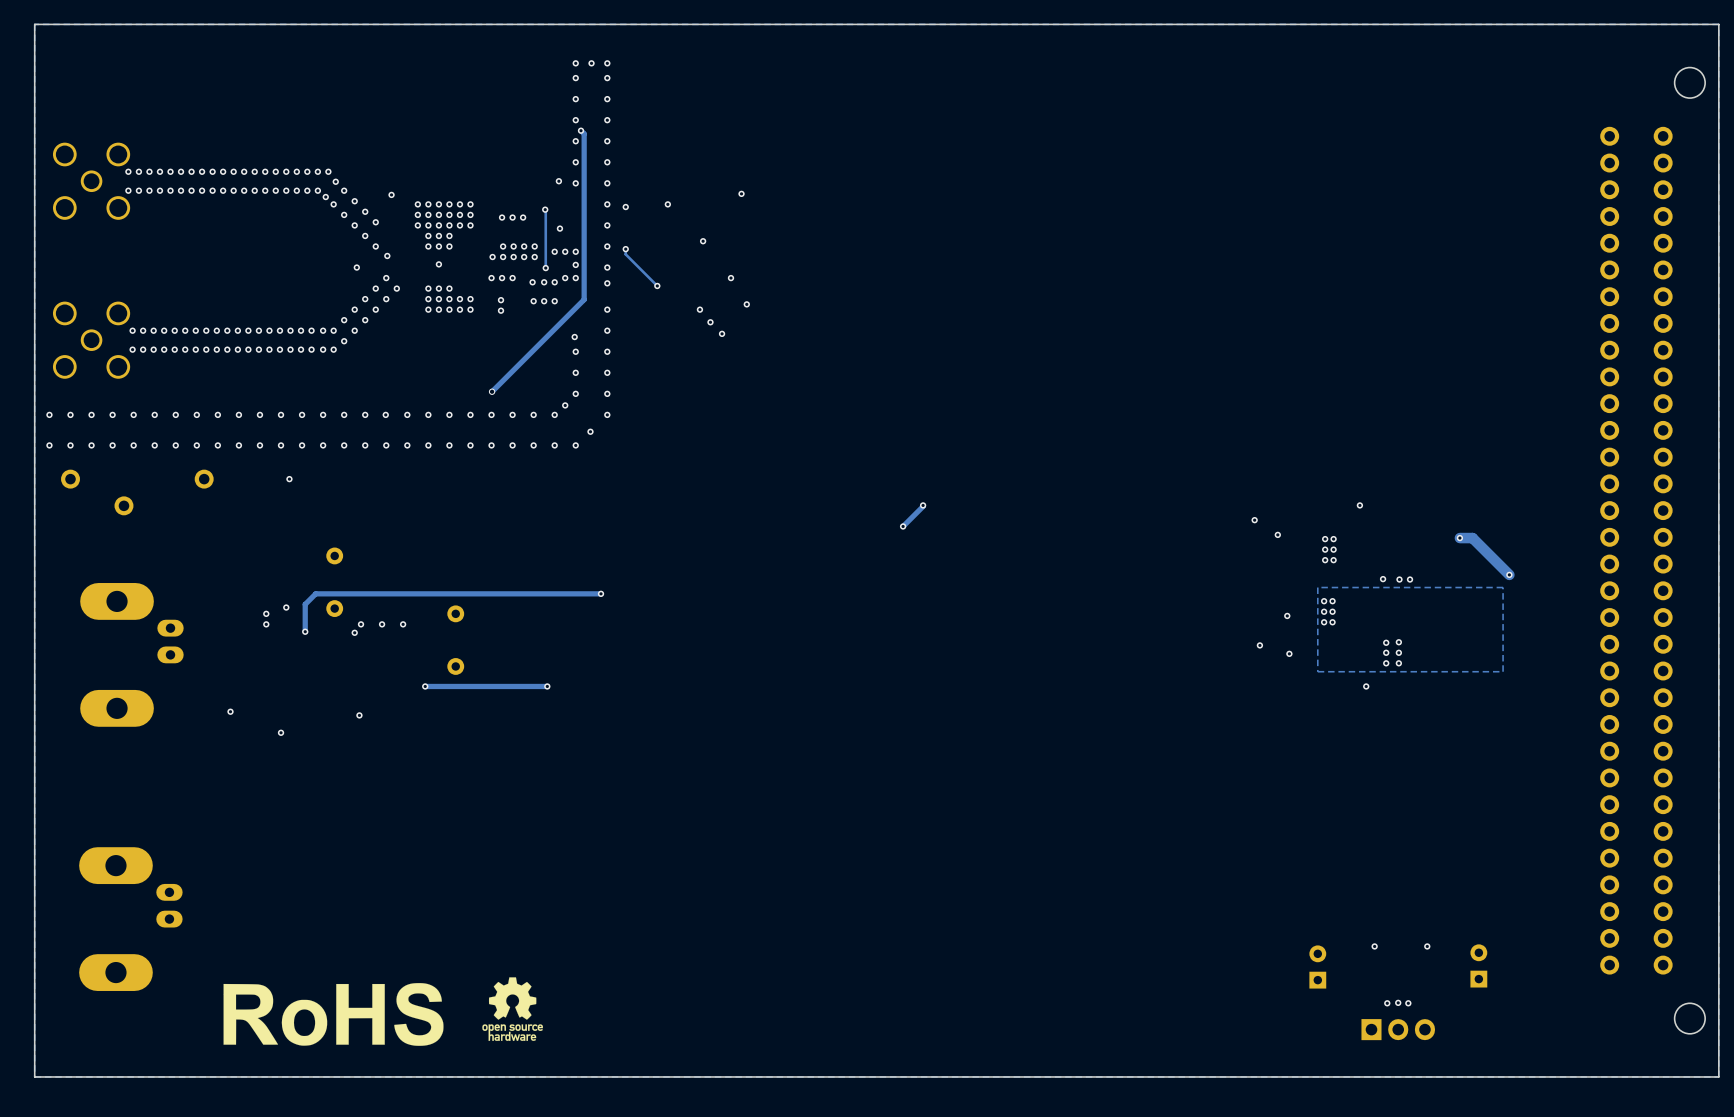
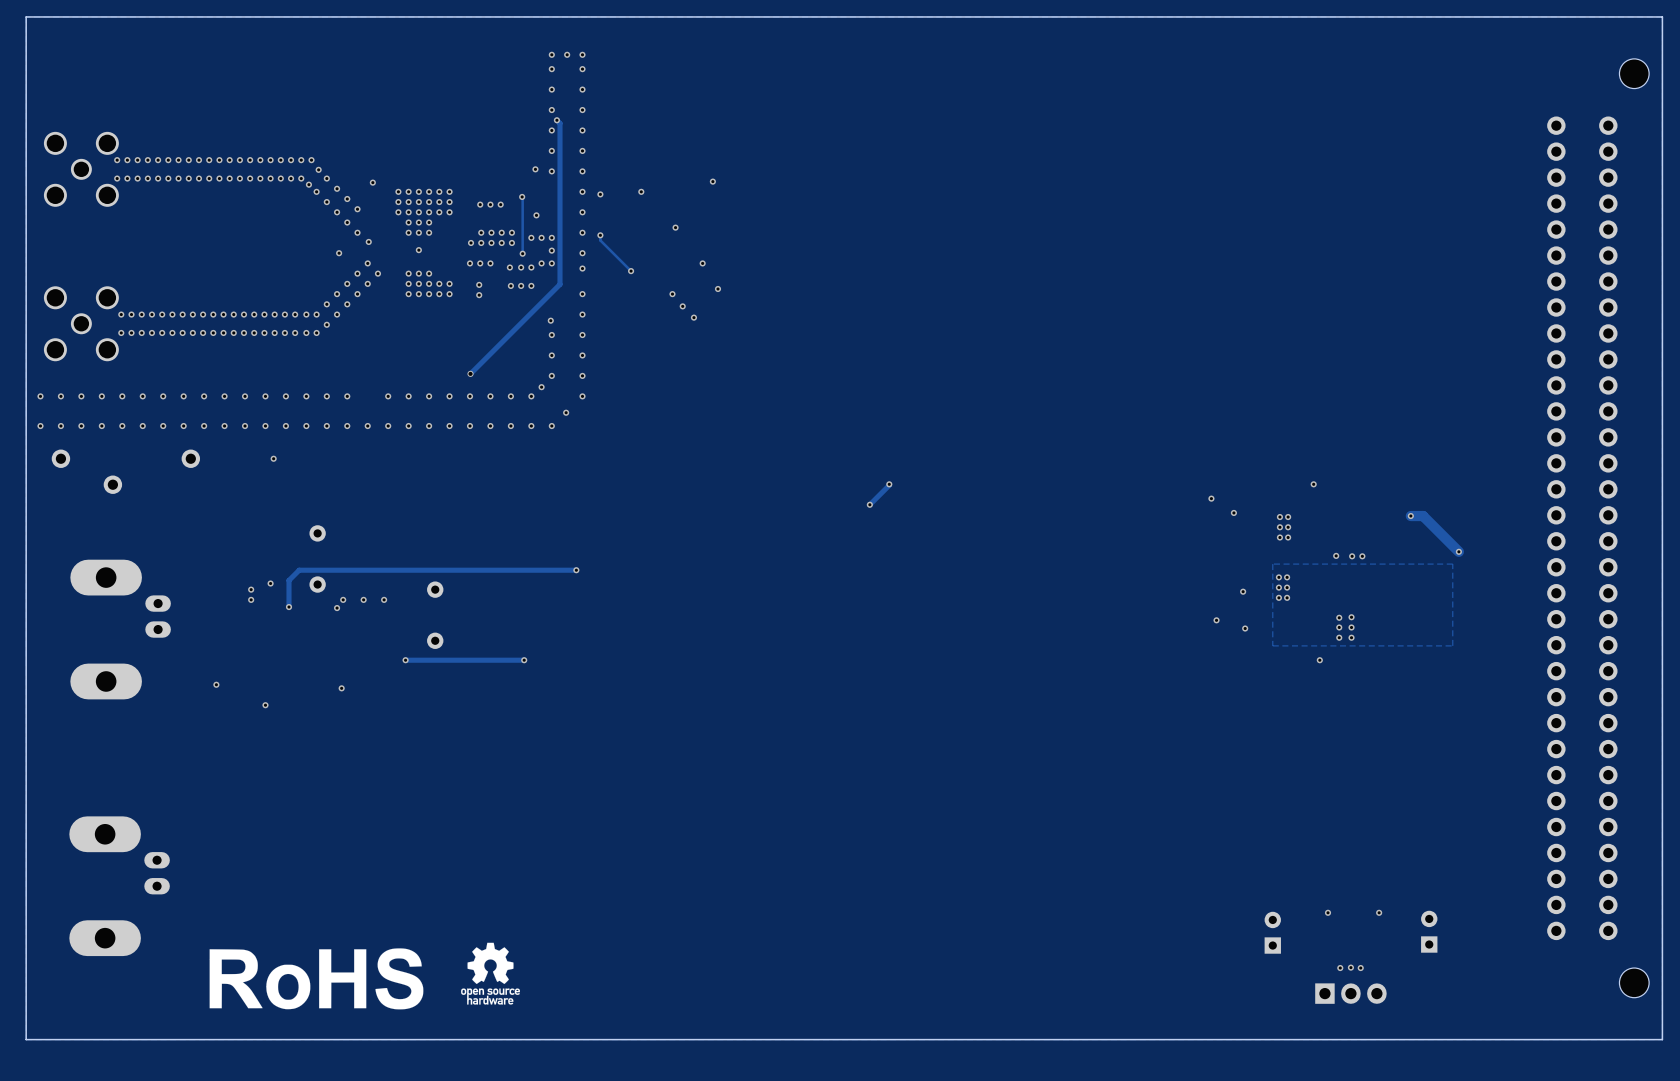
via: (385, 414) -> none

